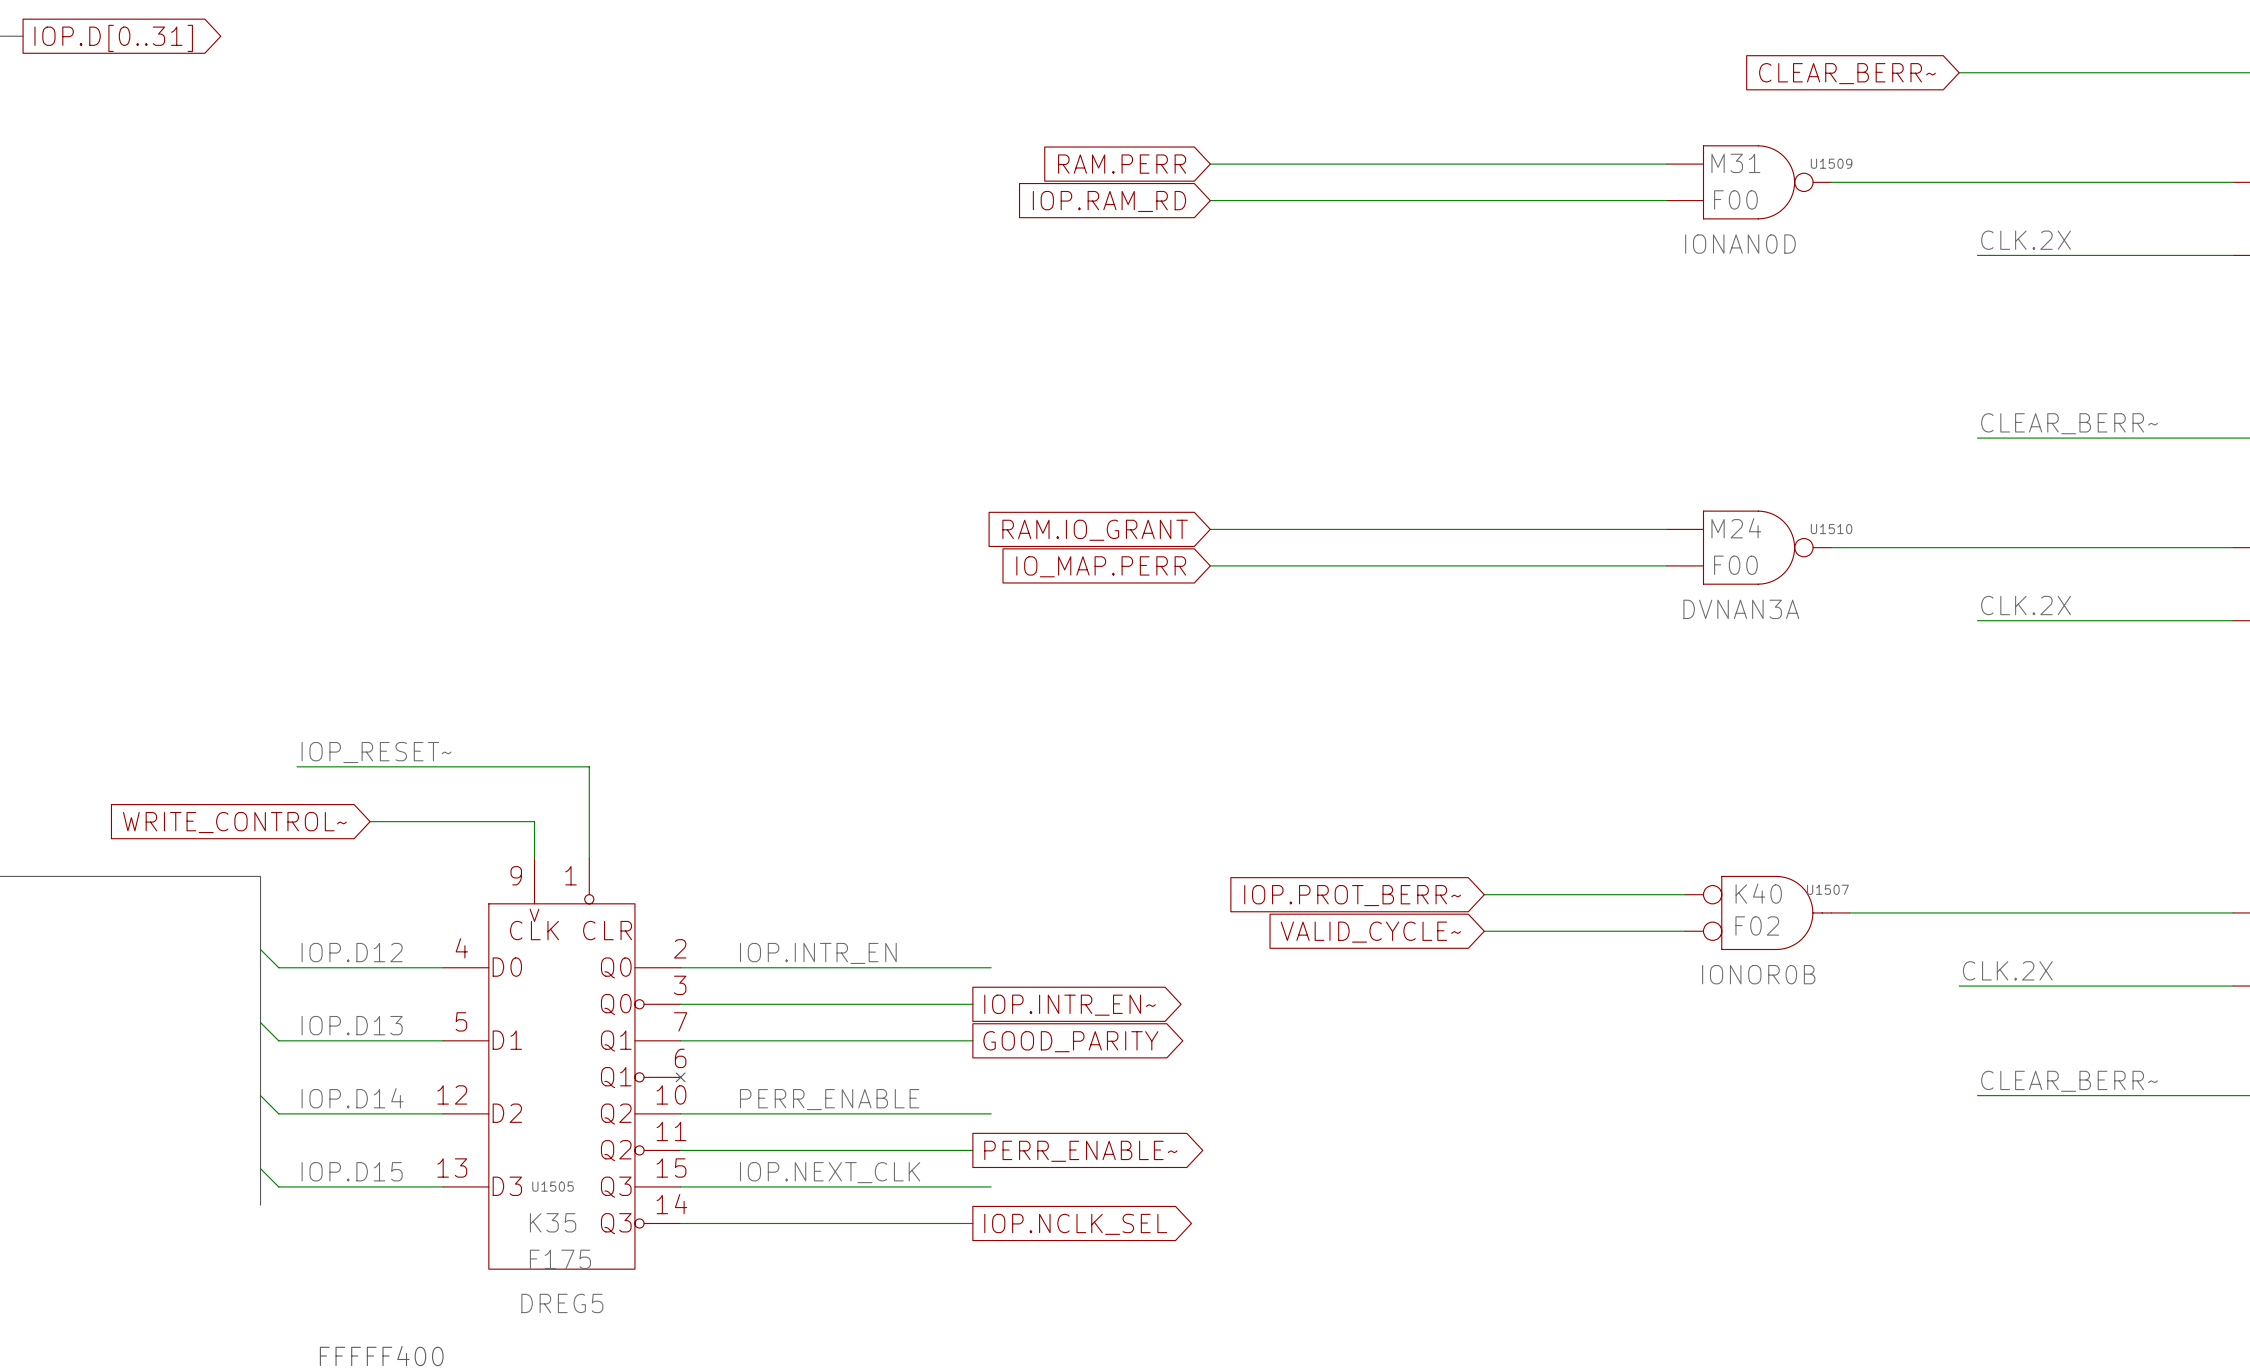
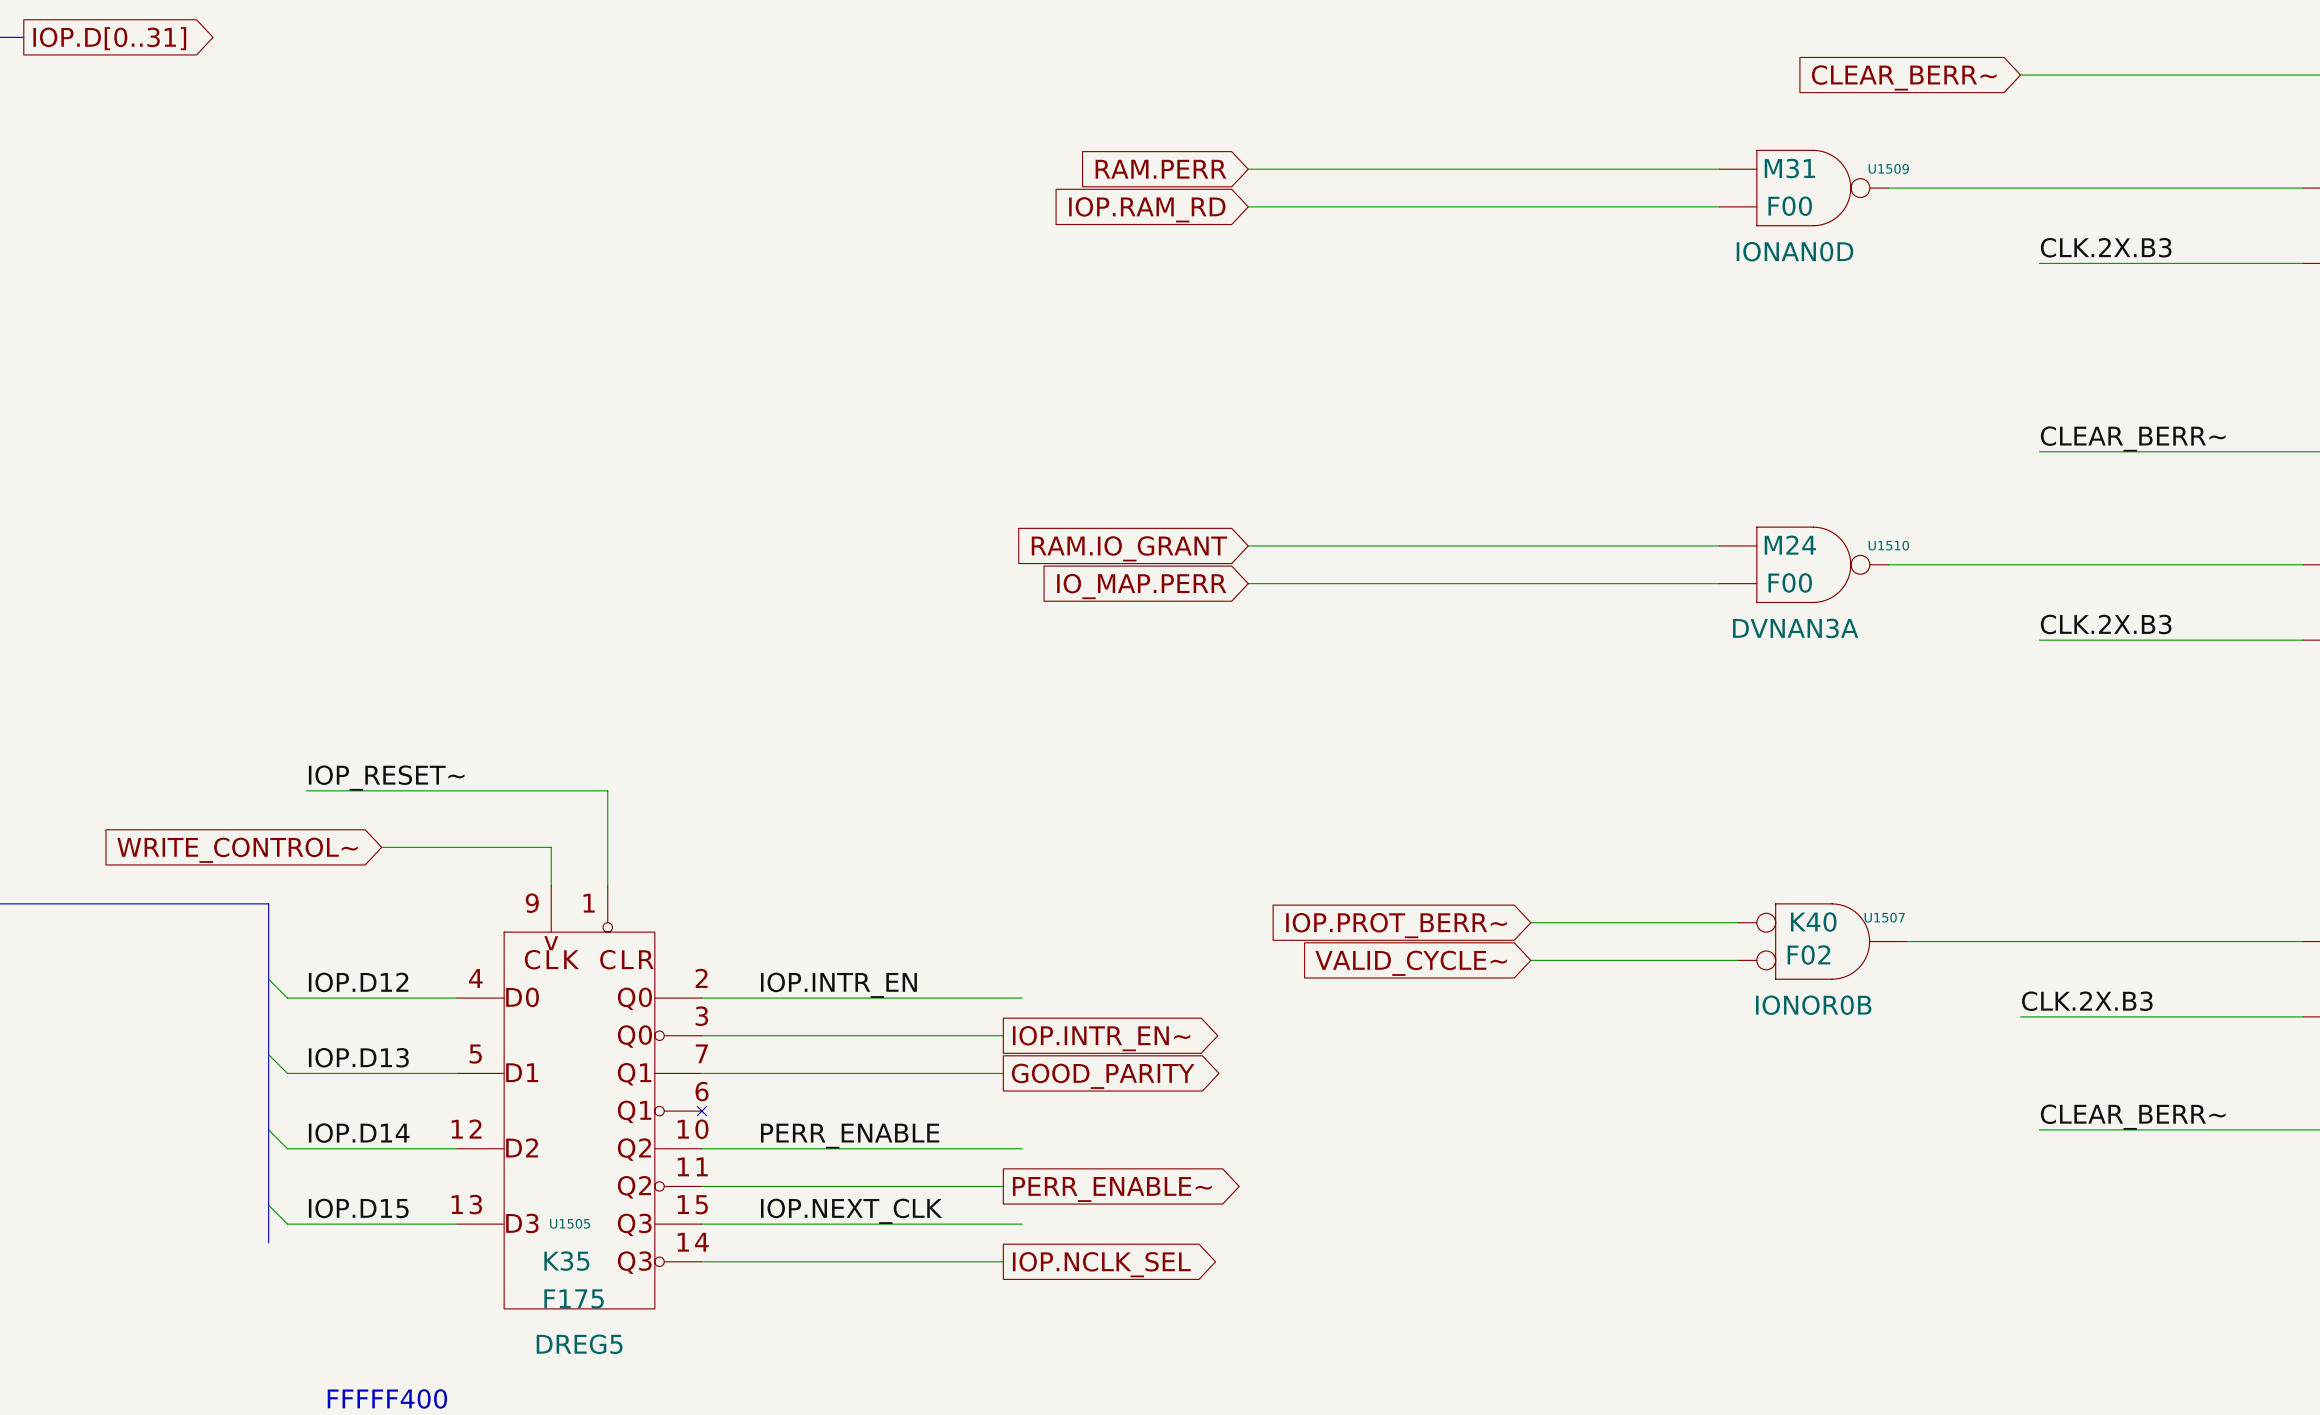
label: CLK.2X (2026, 240) -> CLK.2X.B3 (2106, 247)
label: CLK.2X (2026, 605) -> CLK.2X.B3 (2106, 624)
label: CLK.2X (2007, 970) -> CLK.2X.B3 (2087, 1001)

